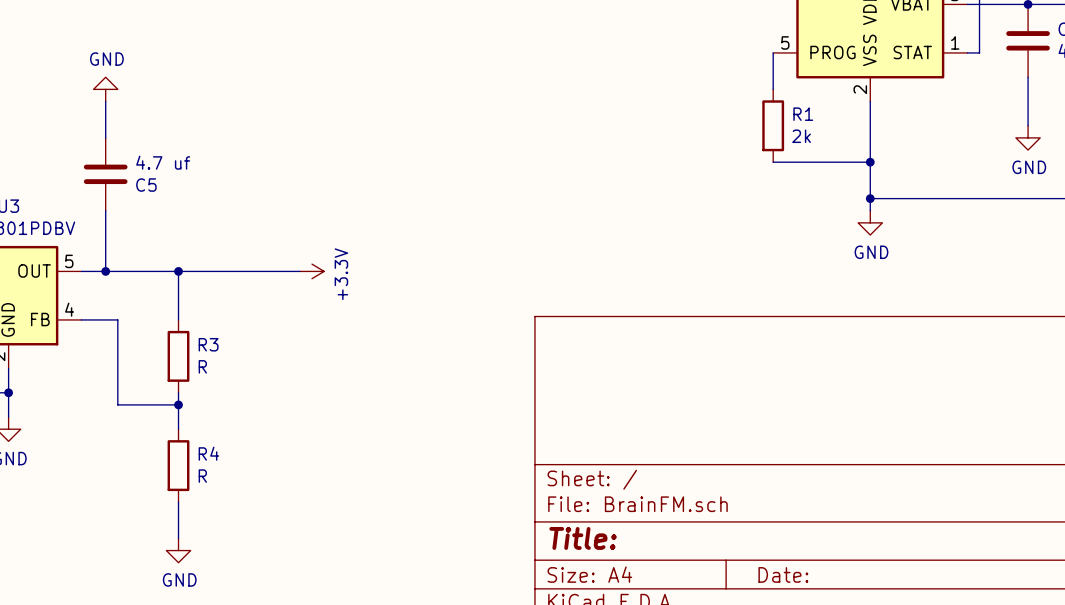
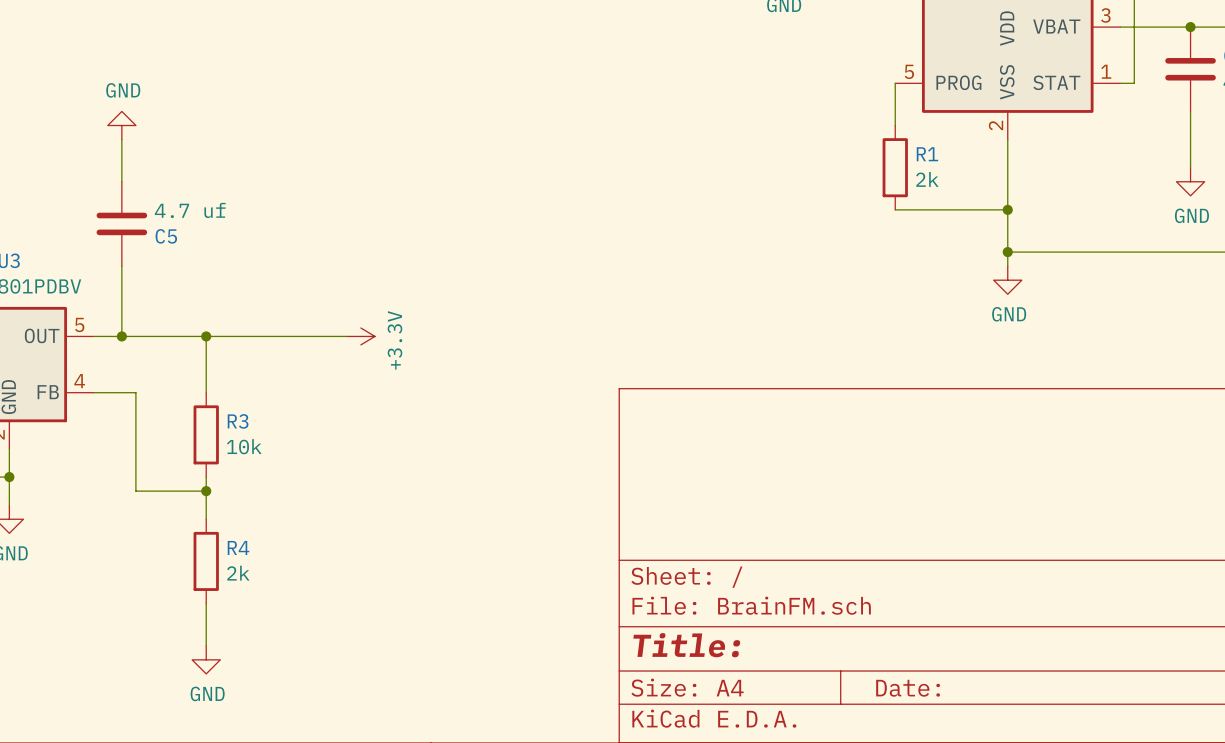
R3 value: R (202, 366) -> 10k (244, 446)
R4 value: R (202, 476) -> 2k (238, 573)

